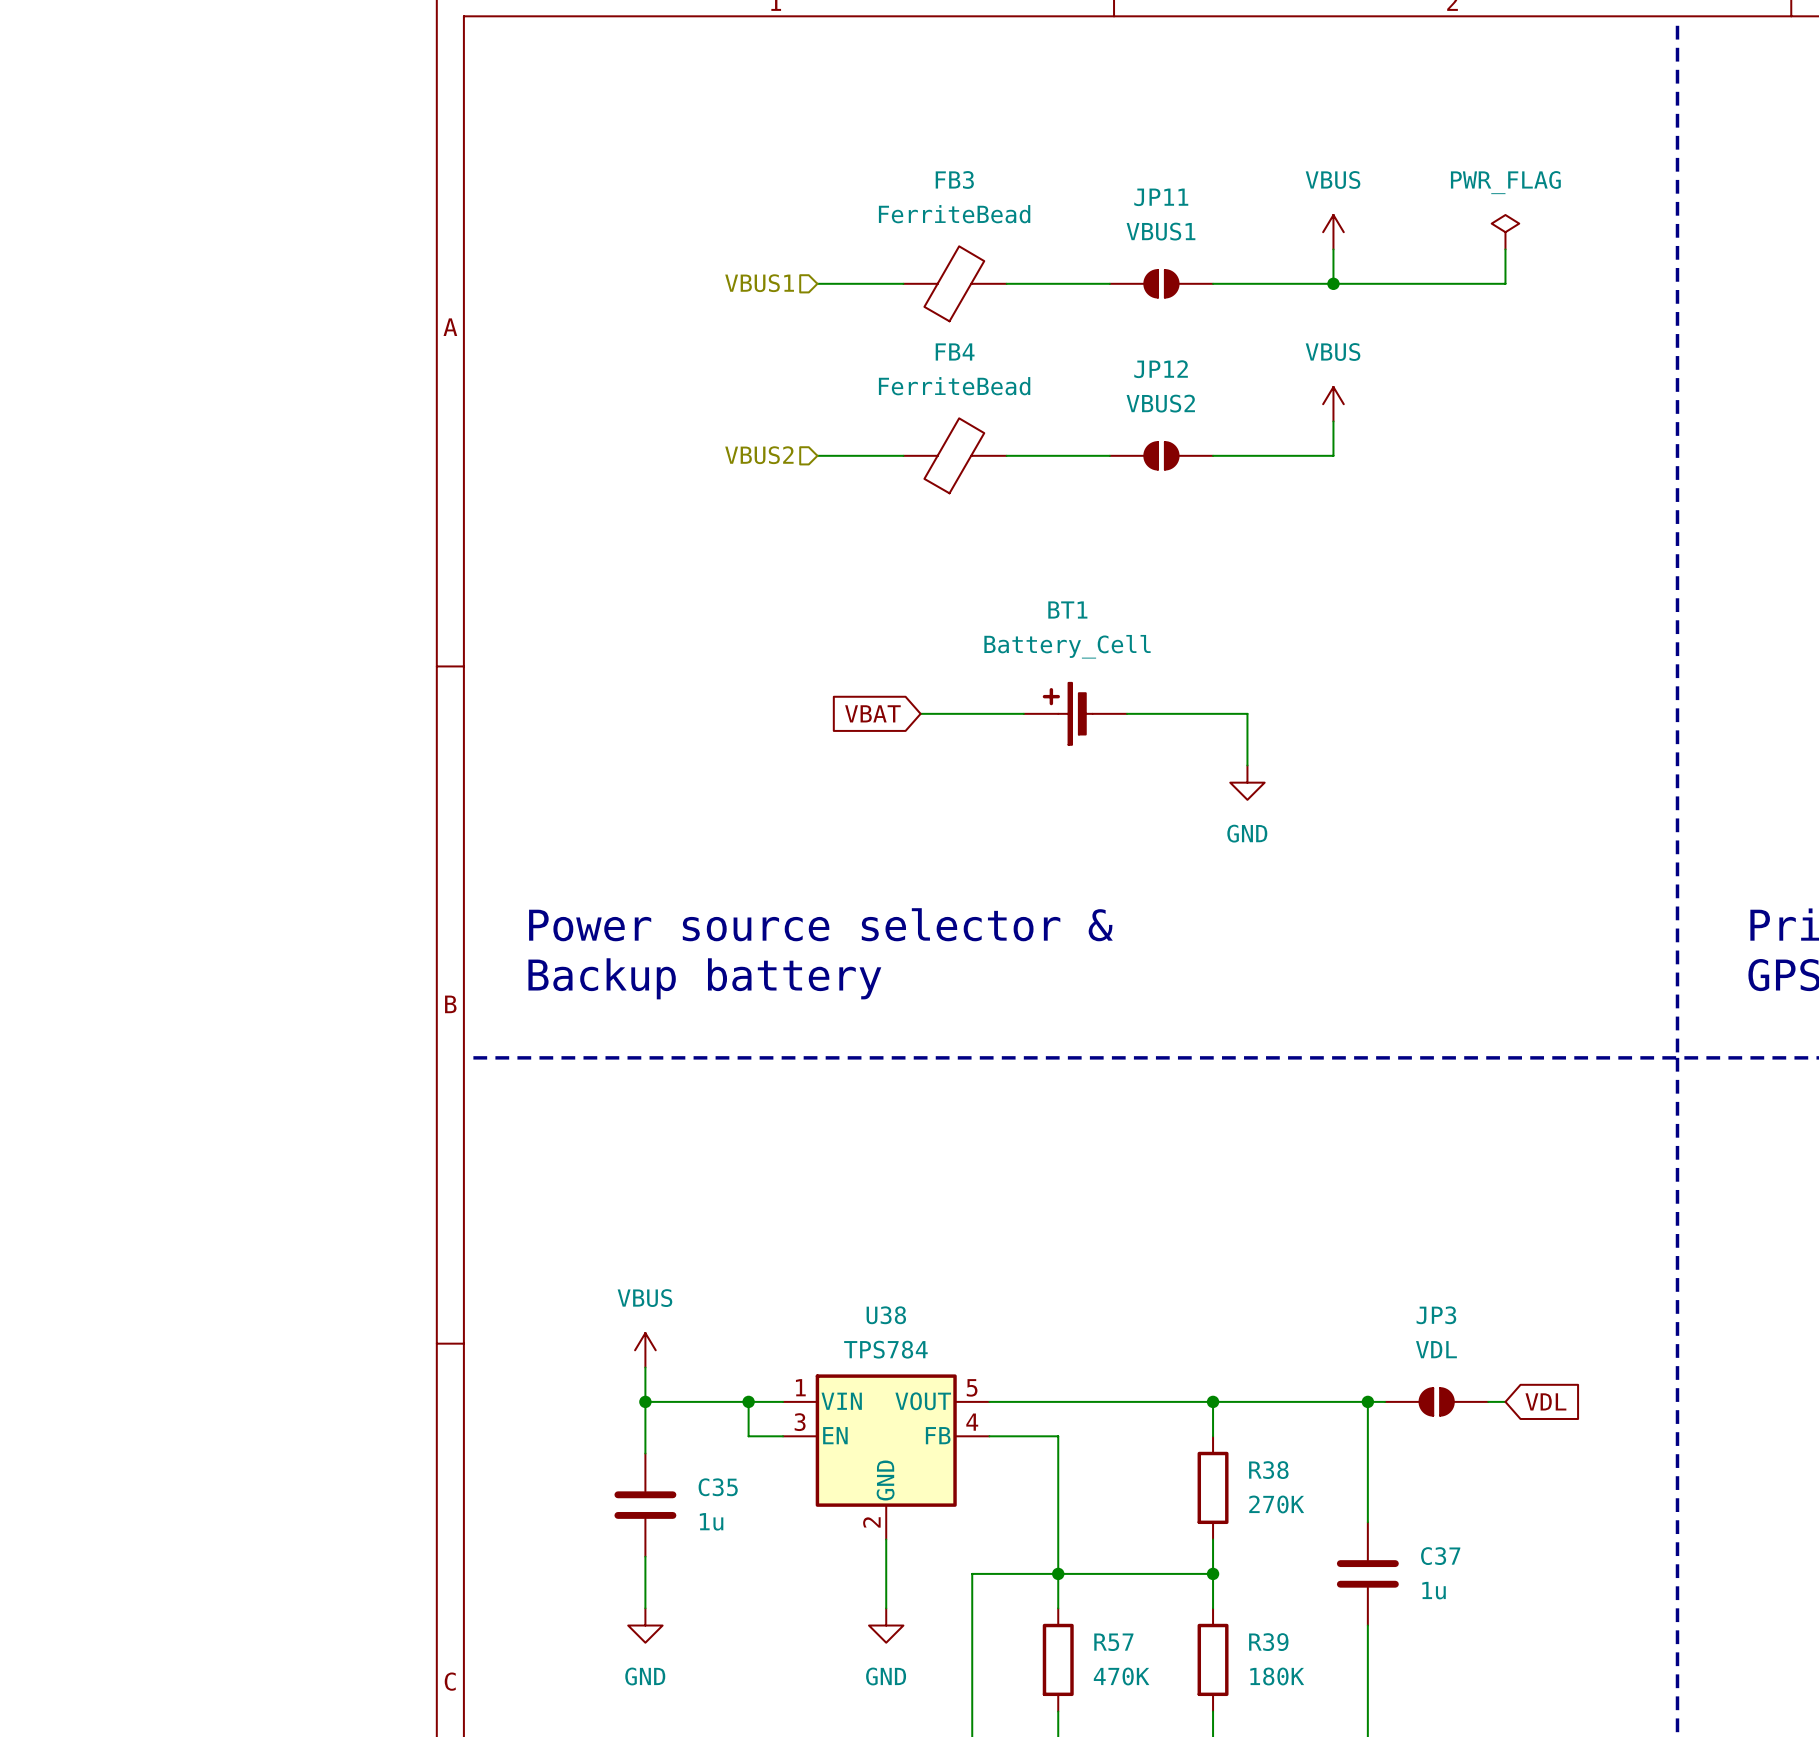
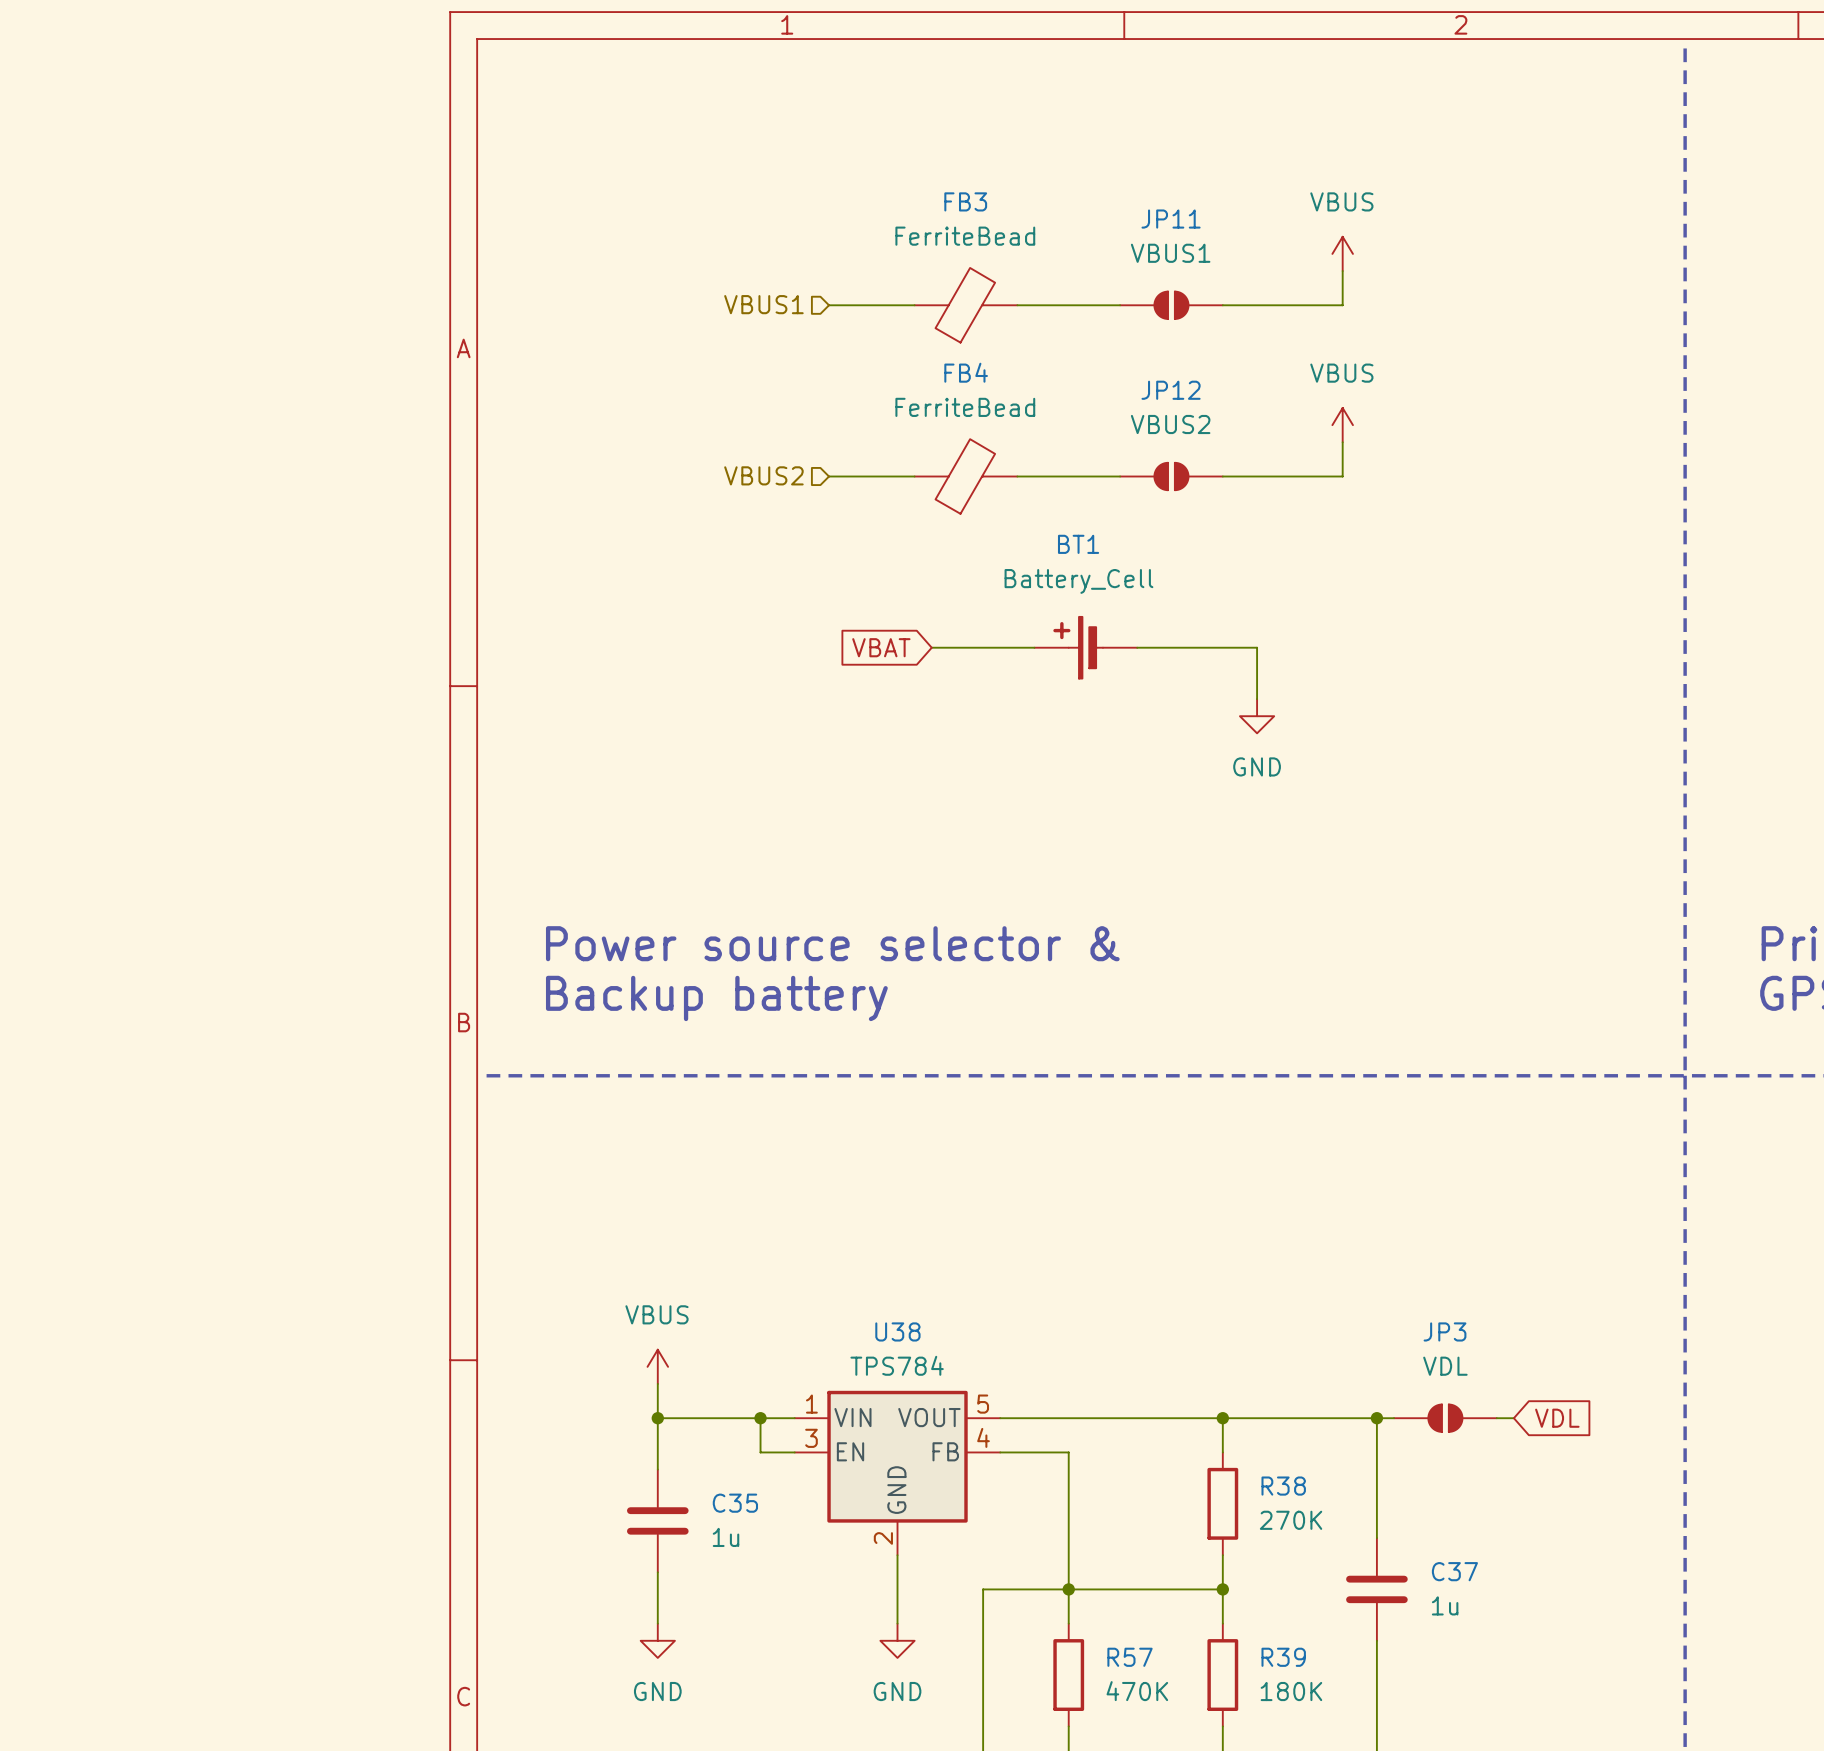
power symbol: PWR_FLAG (1505, 232) -> none
wire: (1505, 249) (1505, 283) (1333, 283) -> none
junction: (1333, 283) -> none
global label position: VBAT (872, 713) -> VBAT (881, 647)
wire: (920, 713) (1023, 713) -> (931, 647) (1034, 647)
BT1 position: (1075, 713) -> (1085, 647)
wire: (1127, 713) (1247, 713) (1247, 765) -> (1137, 647) (1257, 647) (1257, 699)
power symbol position: GND (1247, 782) -> GND (1257, 716)

